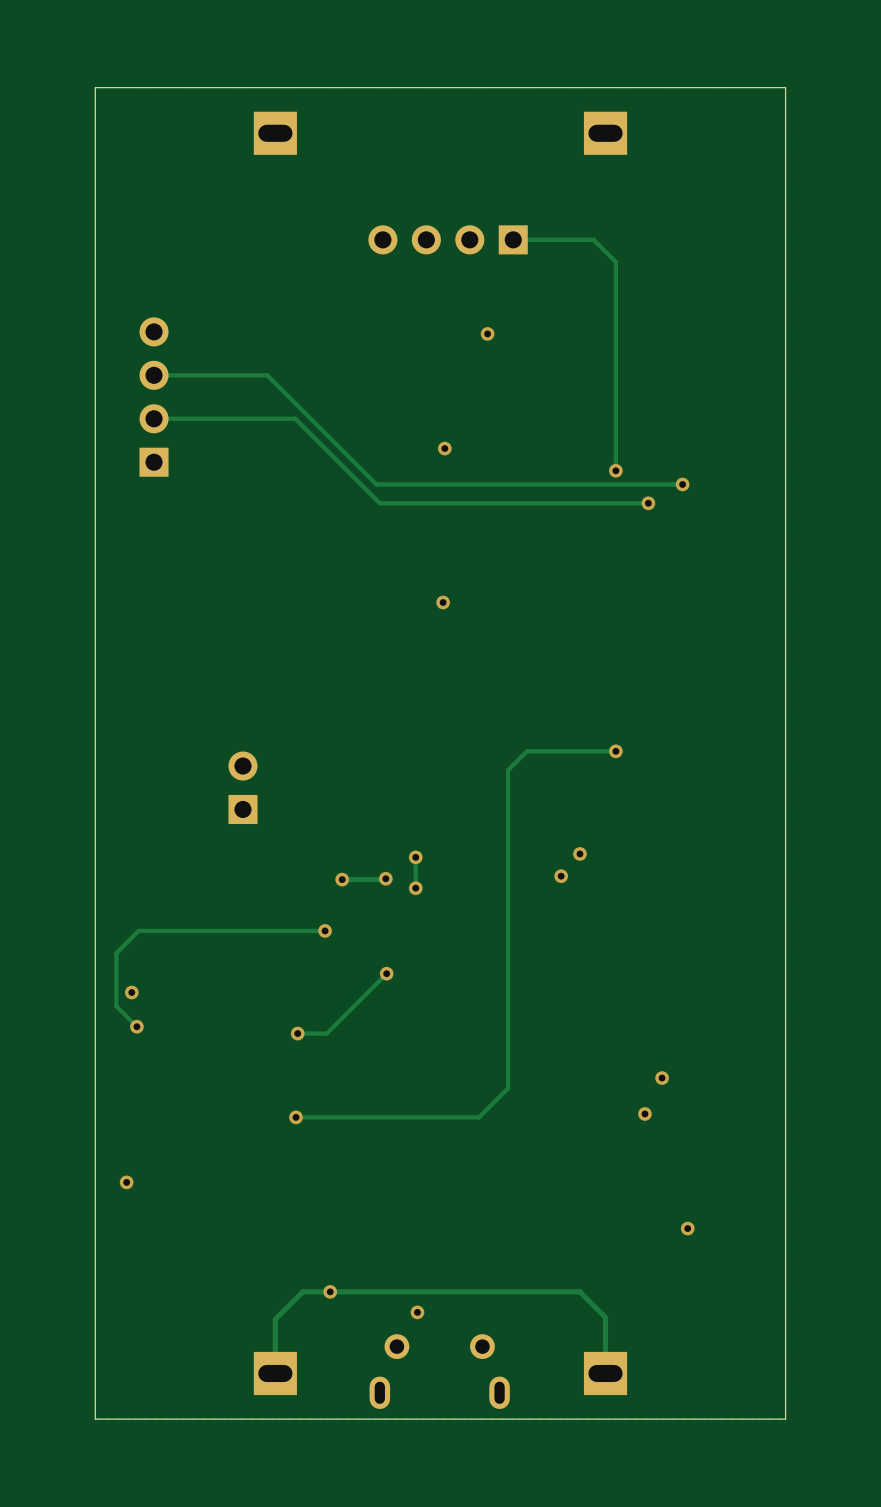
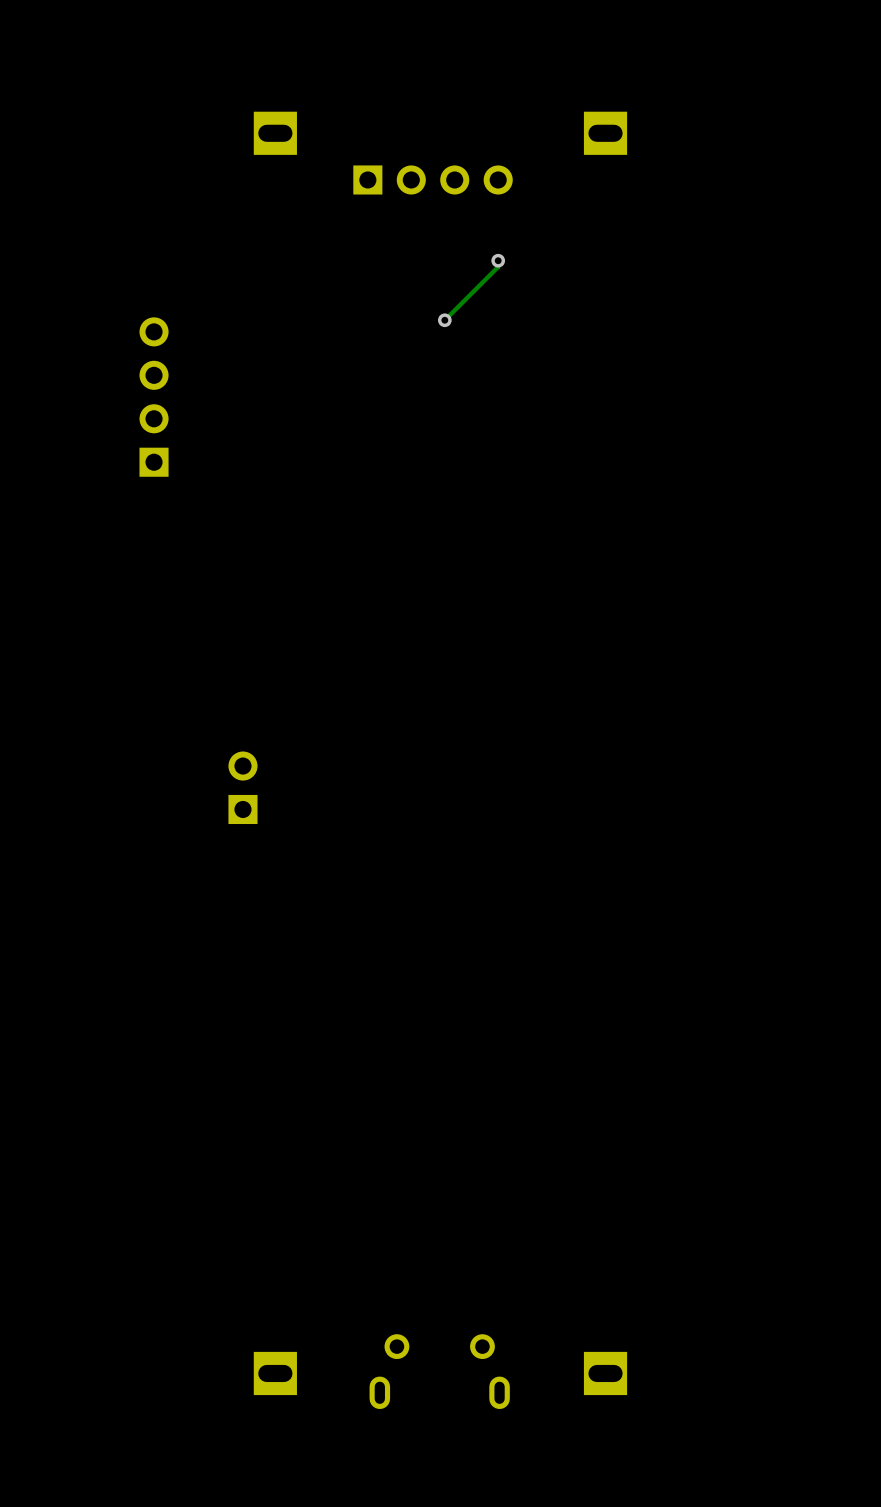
board edge: (785, 87) (785, 1419) (95, 1419) (95, 87) (785, 87) -> none
part rotation: 0° (448, 239) -> 180° (433, 179)
track: (513, 239) (593, 239) (615, 262) (615, 470) -> none
track: none -> (498, 260) (498, 266) (444, 320)
via: none -> (498, 260)
via: none -> (444, 320)
via: (487, 333) -> none
track: (154, 375) (267, 375) (376, 484) (682, 484) -> none
track: (154, 418) (295, 418) (379, 503) (648, 503) -> none
via: (444, 448) -> none
via: (615, 470) -> none
via: (682, 484) -> none
via: (648, 503) -> none
via: (443, 602) -> none
track: (615, 751) (526, 751) (508, 770) (508, 1088) (479, 1117) (296, 1117) -> none
via: (615, 751) -> none
via: (579, 853) -> none
track: (415, 857) (415, 888) -> none
via: (415, 857) -> none
via: (561, 876) -> none
track: (385, 878) (342, 879) -> none
via: (385, 878) -> none
via: (342, 879) -> none
via: (415, 888) -> none
track: (325, 930) (138, 930) (116, 953) (116, 1006) (136, 1026) -> none
via: (325, 930) -> none
track: (386, 973) (326, 1033) (297, 1033) -> none
via: (386, 973) -> none
via: (131, 992) -> none
via: (136, 1026) -> none
via: (297, 1033) -> none
via: (662, 1078) -> none
via: (644, 1113) -> none
via: (296, 1117) -> none
via: (126, 1182) -> none
via: (687, 1228) -> none
via: (330, 1291) -> none
via: (417, 1312) -> none
track: (605, 1373) (605, 1317) (579, 1291) (302, 1291) (275, 1319) (275, 1373) -> none

